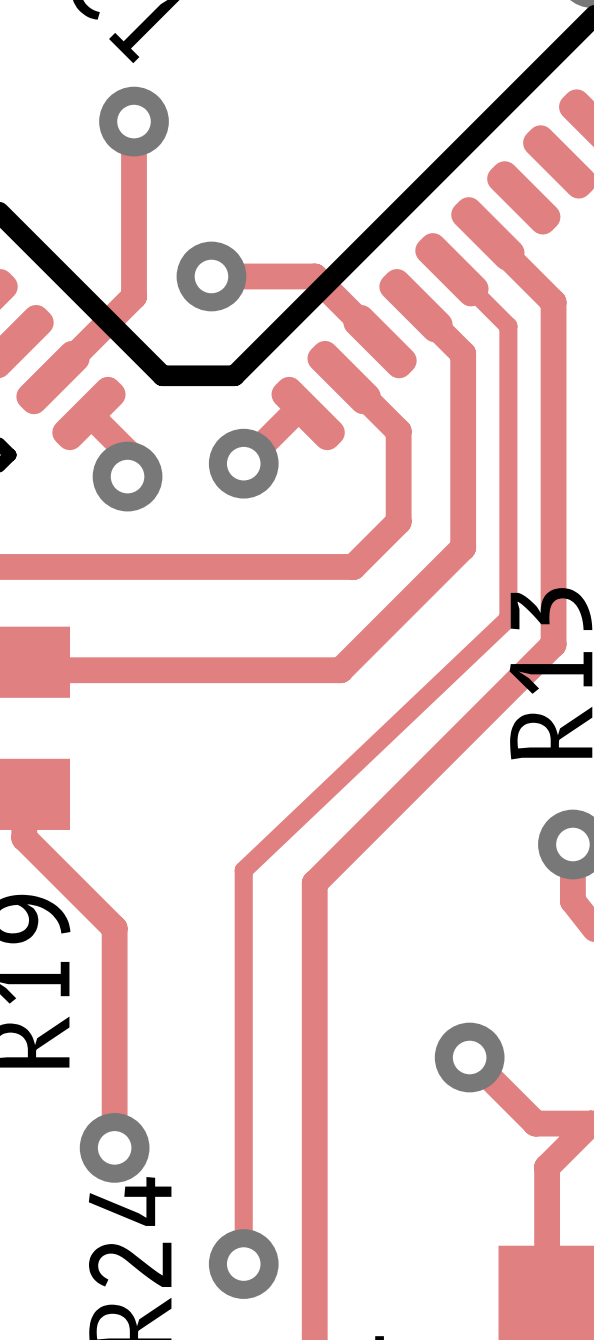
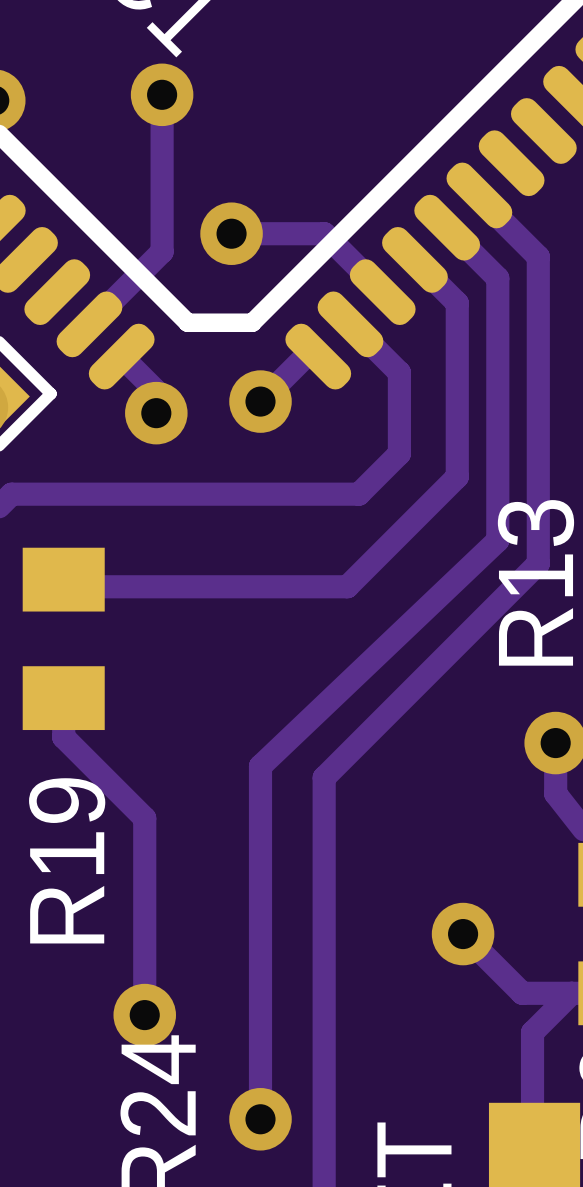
track width: thin (451, 269) (508, 326) (508, 618) (243, 870) (243, 1264) -> thick (447, 227) (497, 278) (497, 540) (260, 766) (260, 1119)

